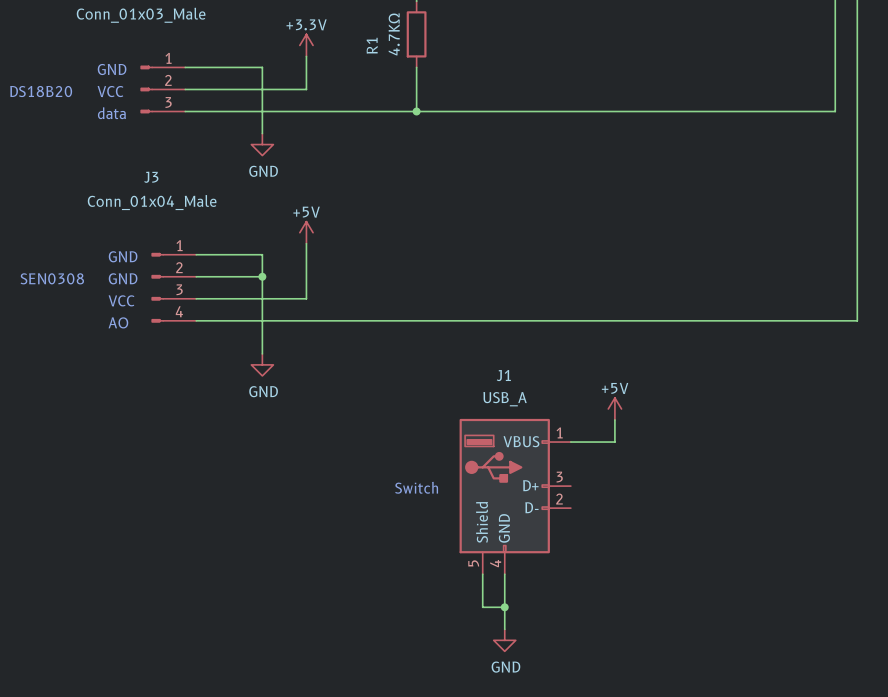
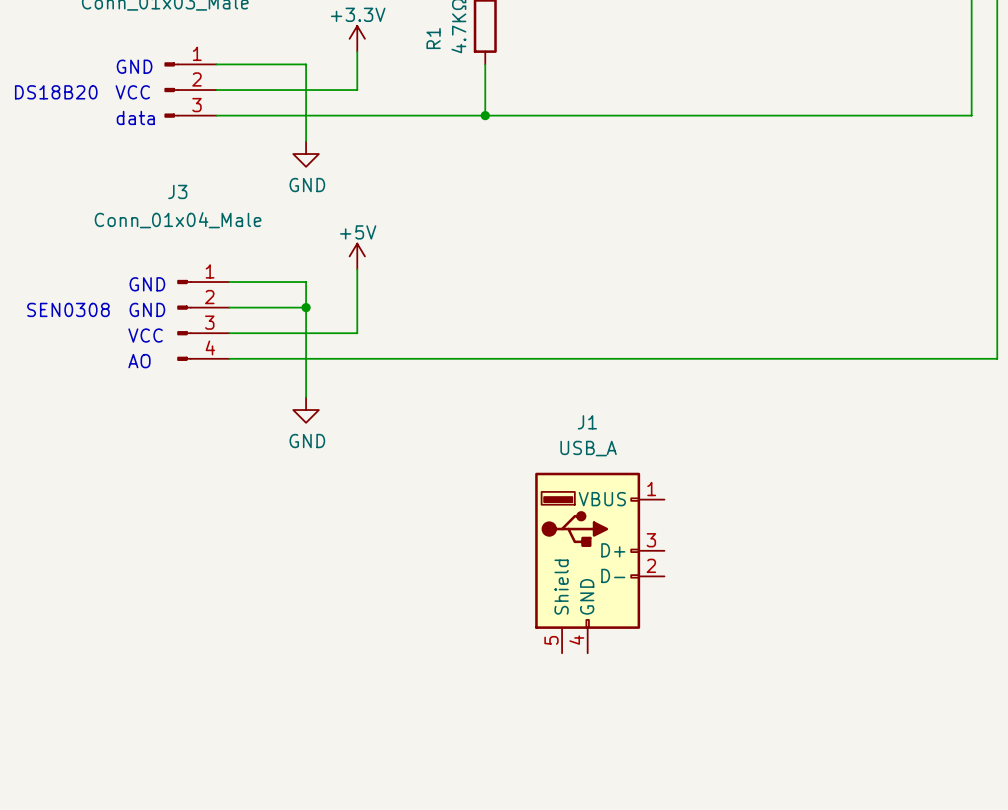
power symbol: +5V (614, 408) -> none
wire: (614, 419) (614, 442) (570, 442) -> none
text: Switch (416, 487) -> none
wire: (482, 574) (482, 607) (504, 607) -> none
wire: (504, 574) (504, 629) -> none
junction: (504, 607) -> none
power symbol: GND (504, 640) -> none

